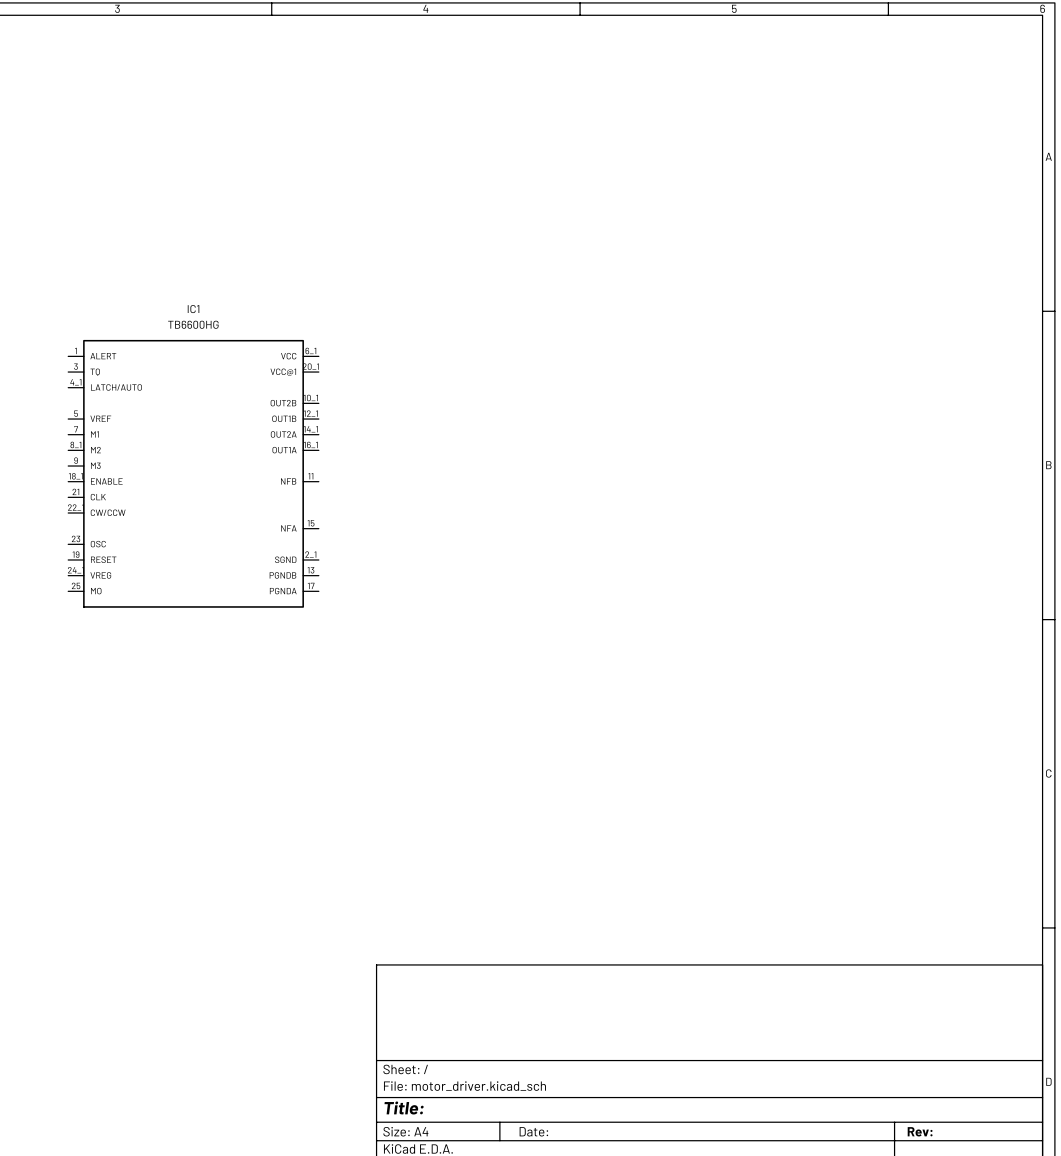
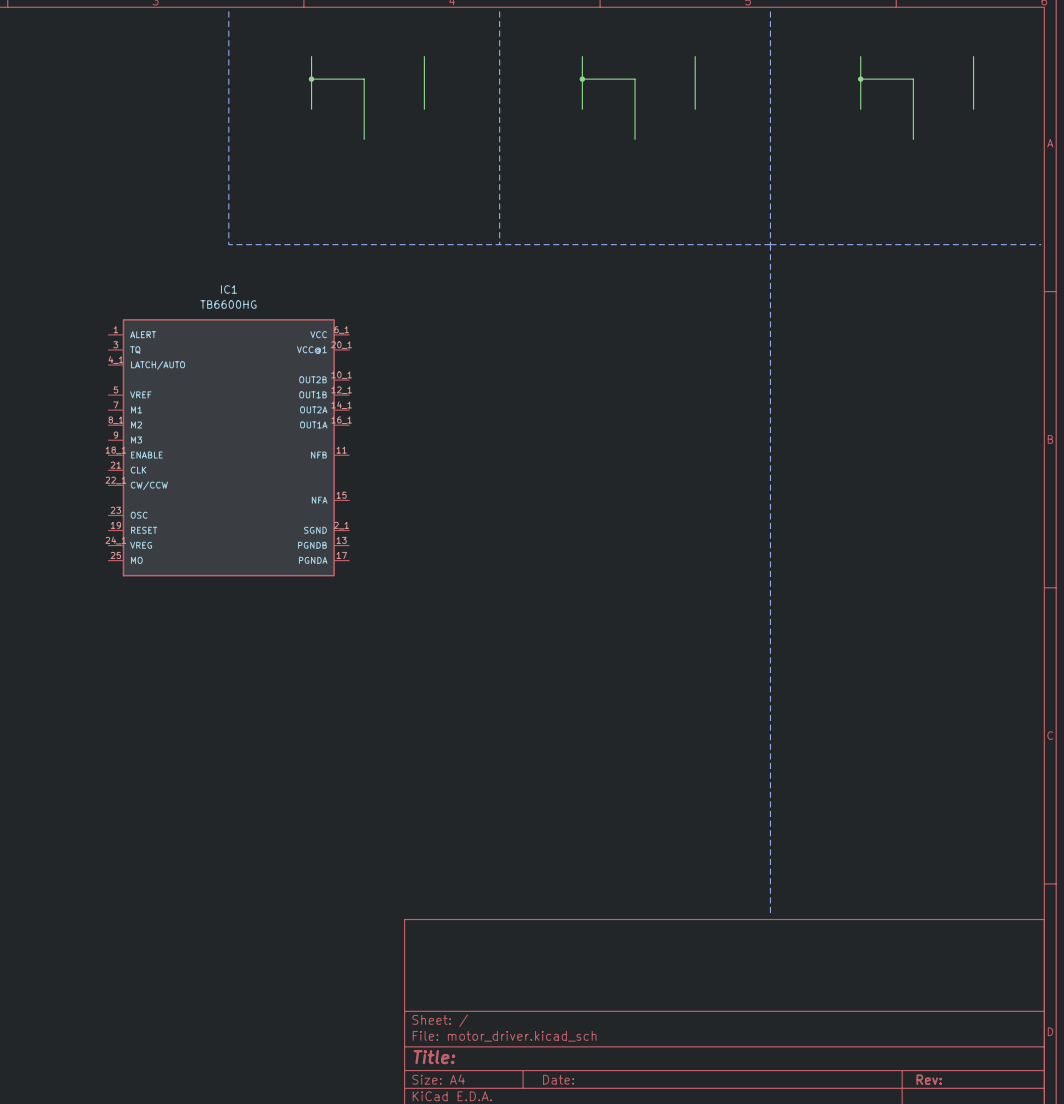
line: none -> (228, 11) (228, 244) (1041, 244)
line: none -> (499, 11) (499, 244)
line: none -> (770, 11) (770, 914)
wire: none -> (311, 56) (311, 109)
wire: none -> (424, 56) (424, 109)
wire: none -> (582, 56) (582, 109)
wire: none -> (695, 56) (695, 109)
wire: none -> (860, 56) (860, 109)
wire: none -> (973, 56) (973, 109)
wire: none -> (311, 79) (364, 79) (364, 139)
junction: none -> (311, 79)
wire: none -> (582, 79) (635, 79) (635, 139)
junction: none -> (582, 79)
wire: none -> (860, 79) (913, 79) (913, 139)
junction: none -> (860, 79)

